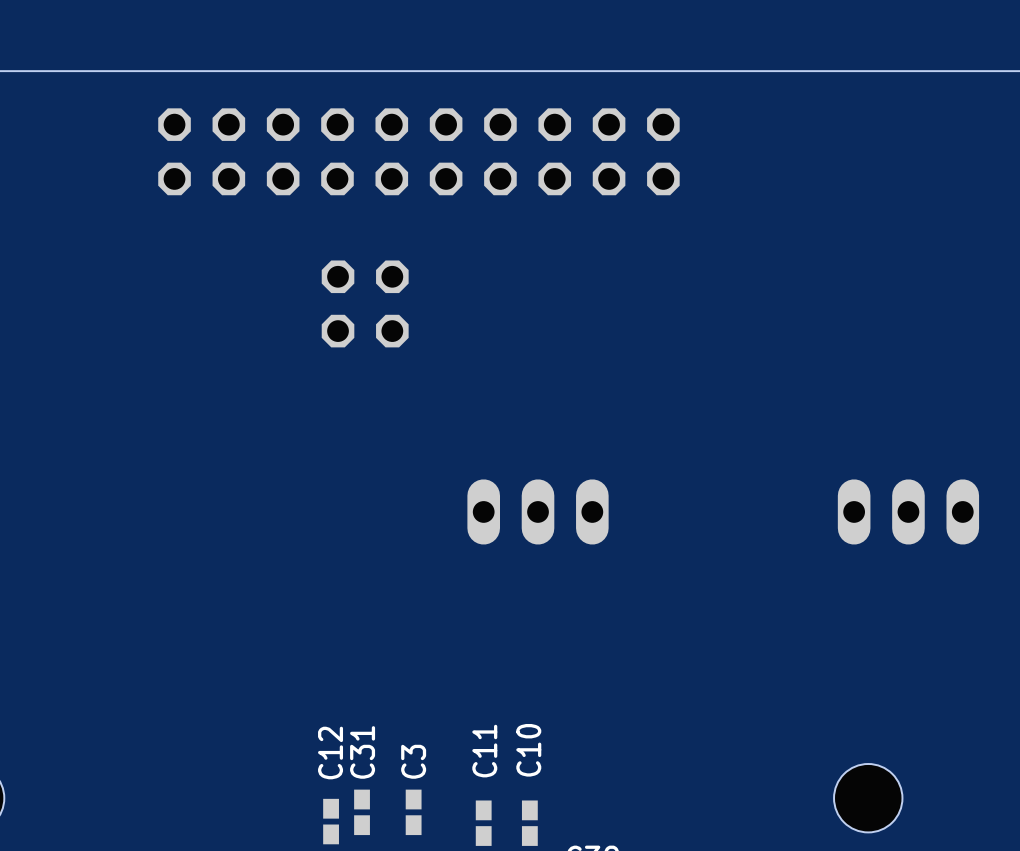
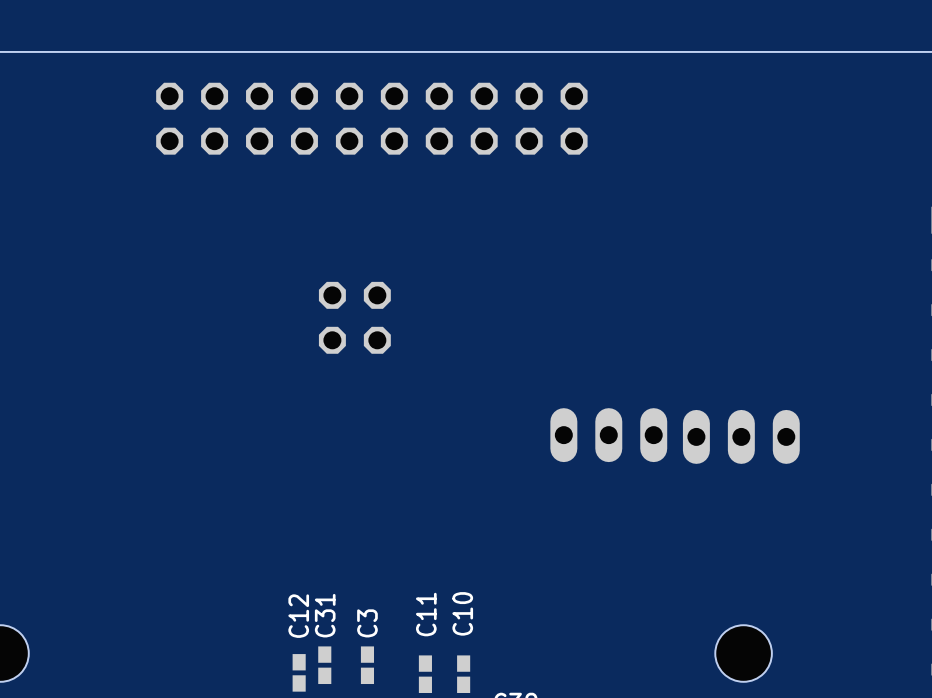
part position: (365, 303) -> (354, 317)
part: (538, 511) -> none
part position: (908, 511) -> (741, 436)
part: none -> (608, 435)

